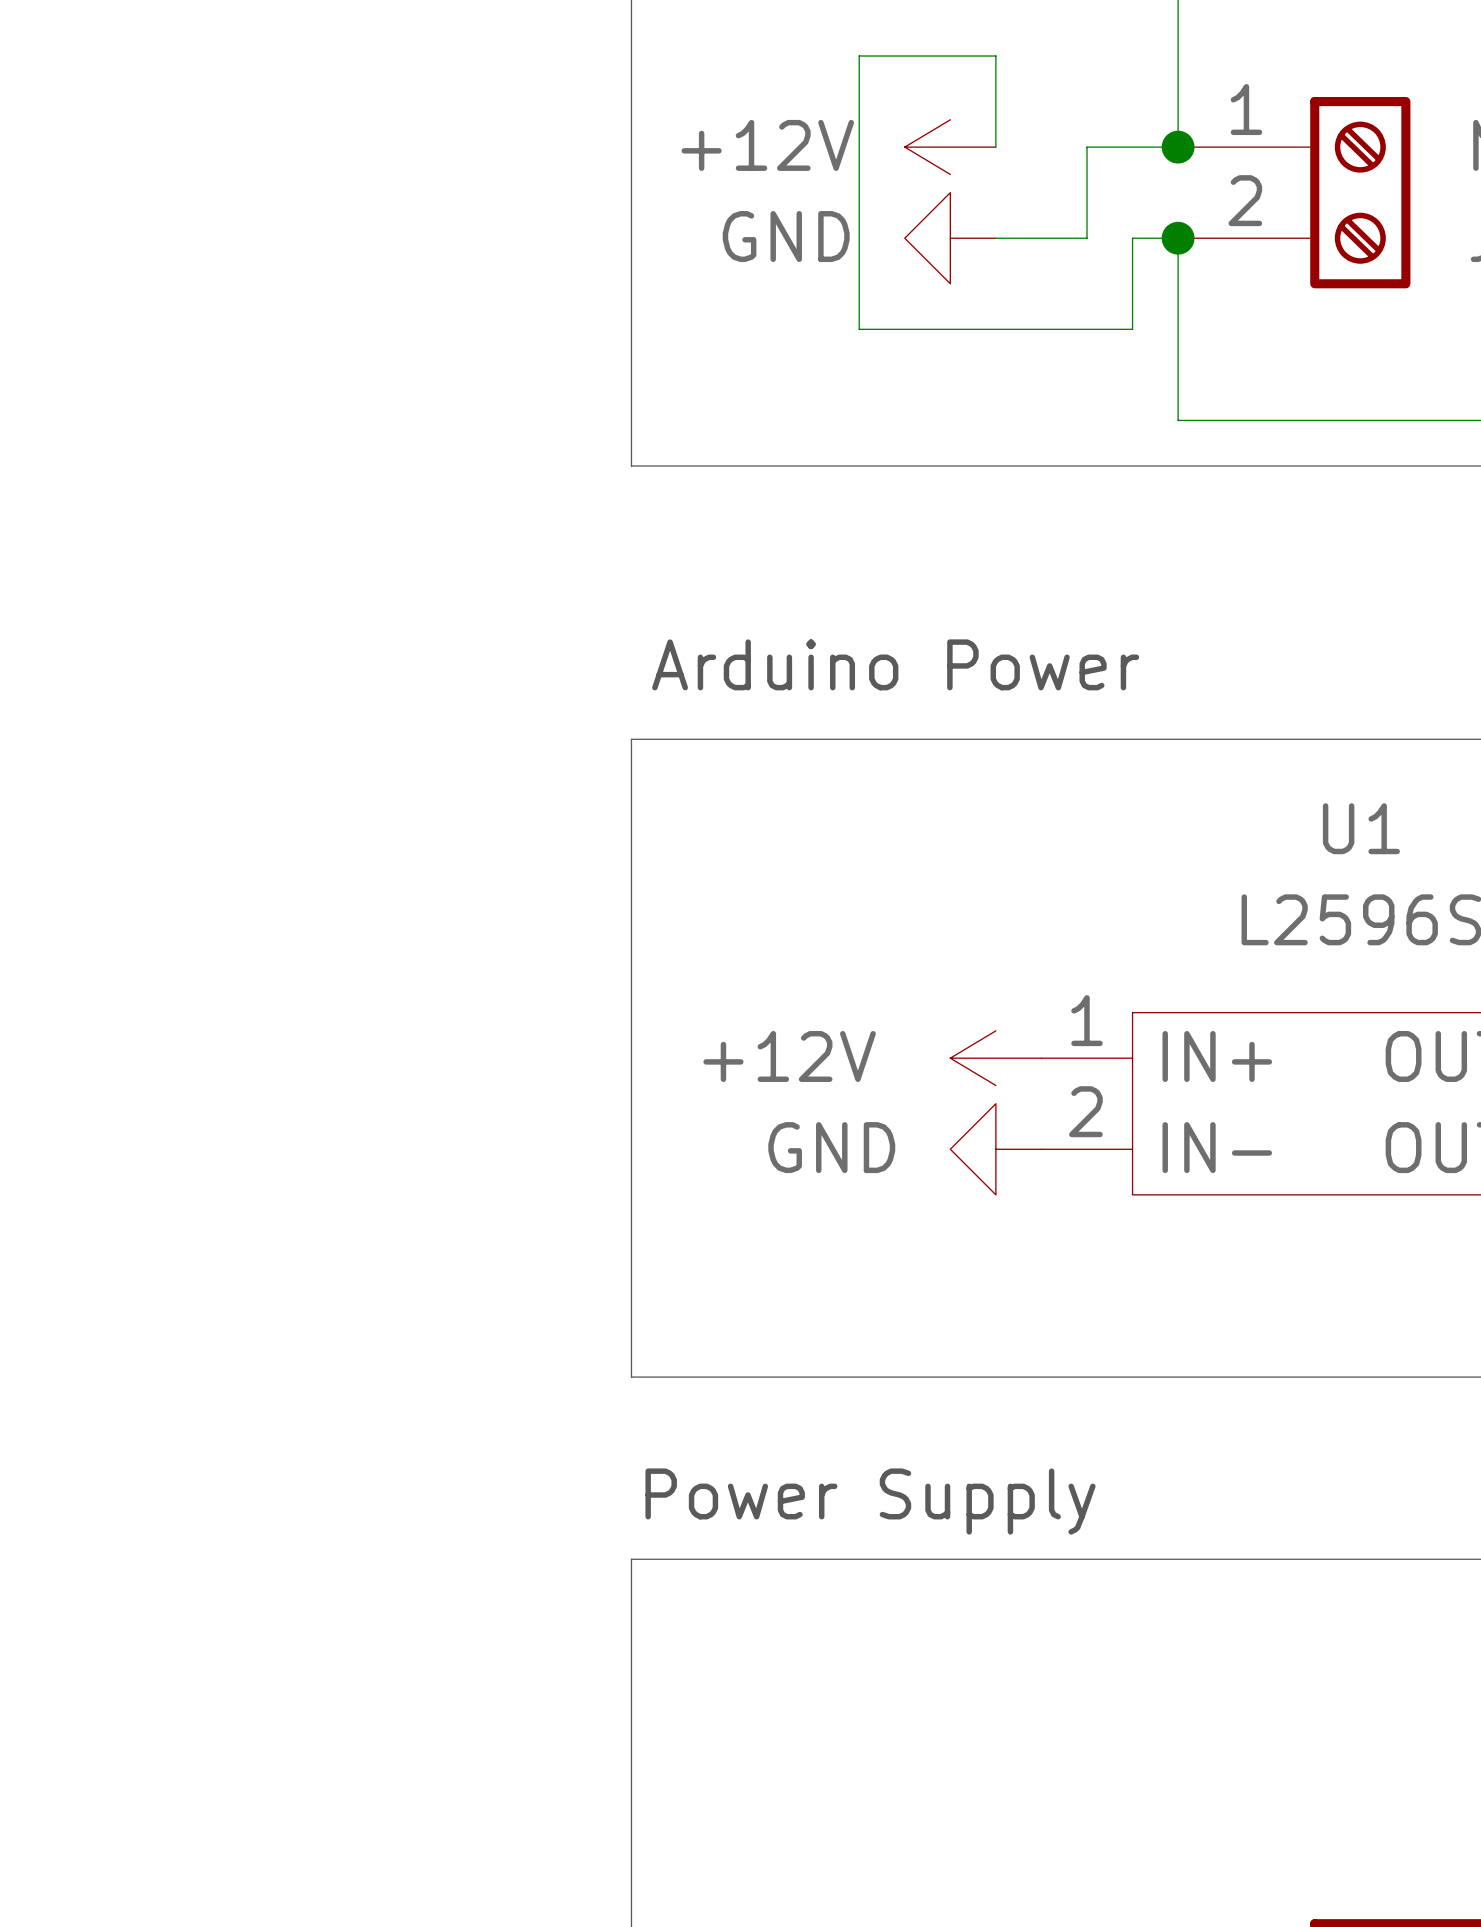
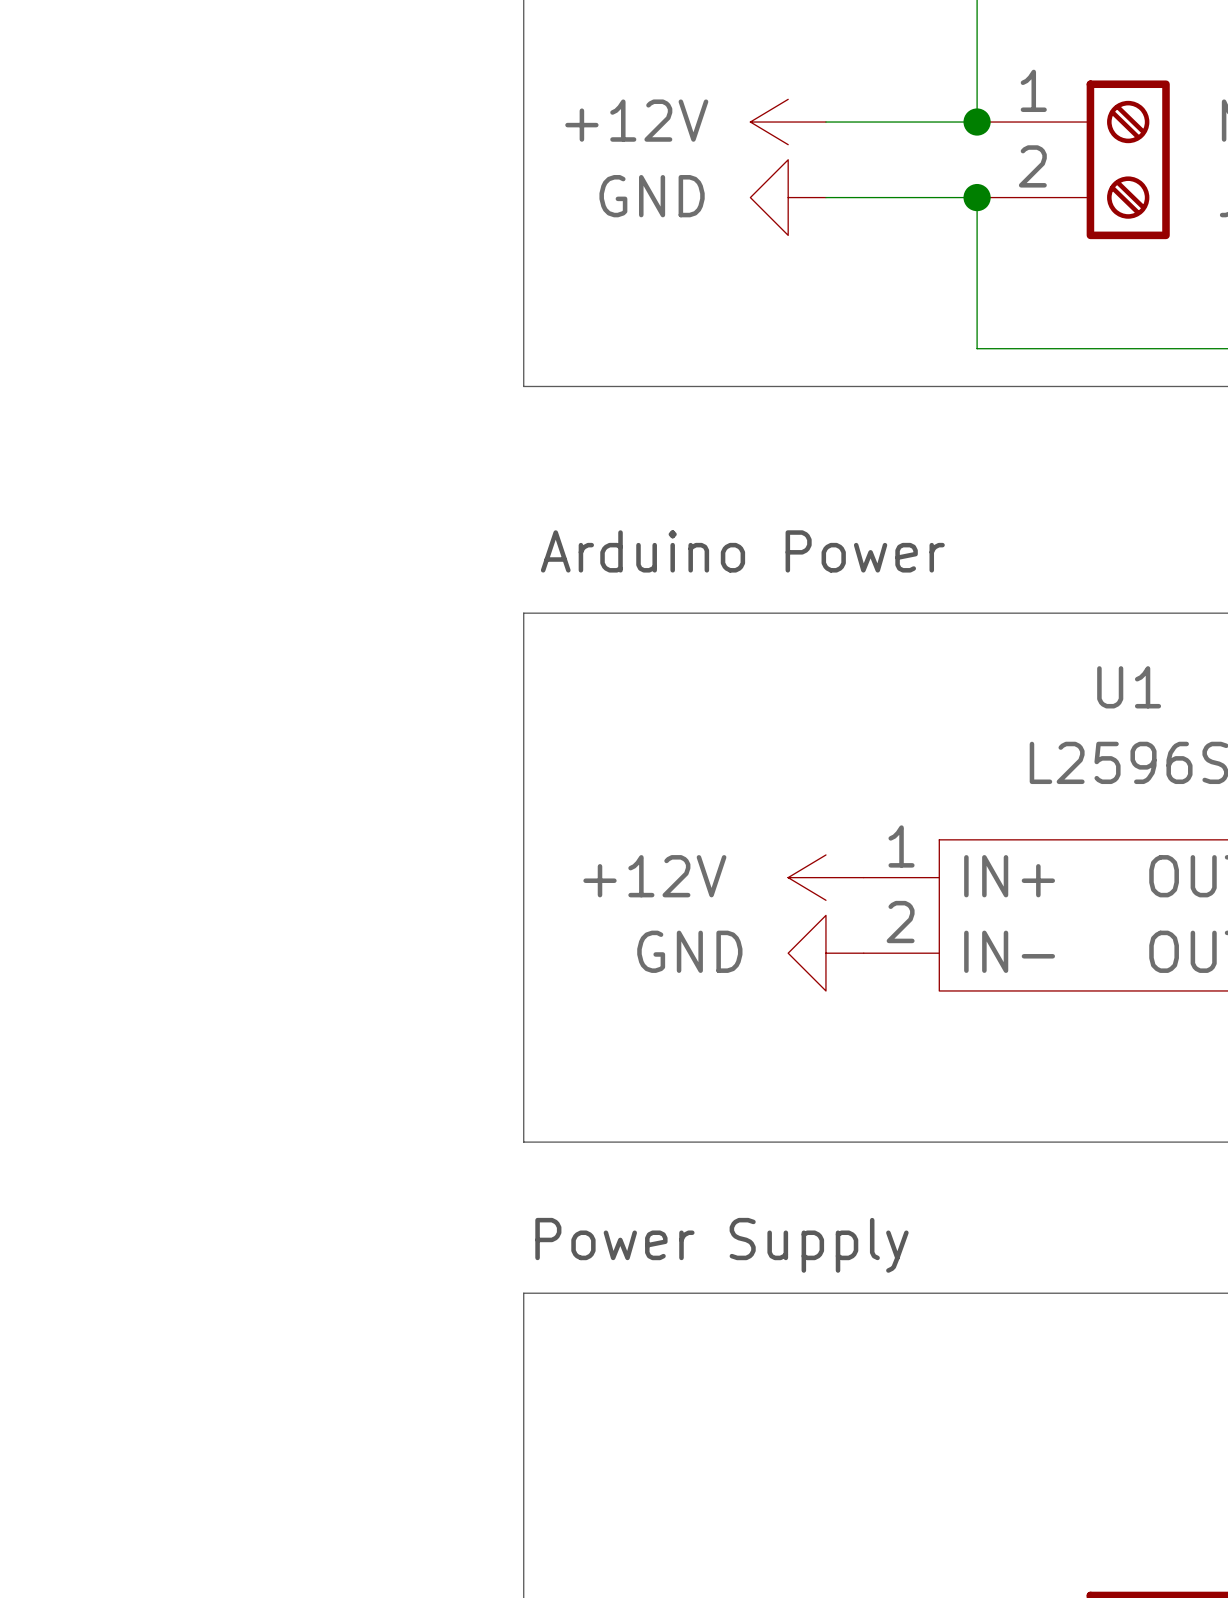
wire: (995, 147) (995, 56) (859, 56) (859, 329) (1132, 329) (1132, 238) -> (825, 122) (901, 122)
wire: (1086, 147) (1086, 238) -> (939, 197) (901, 197)

